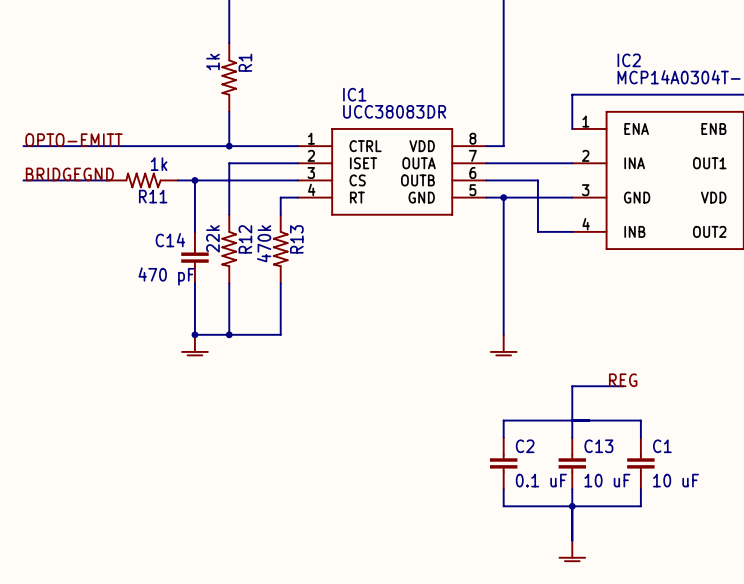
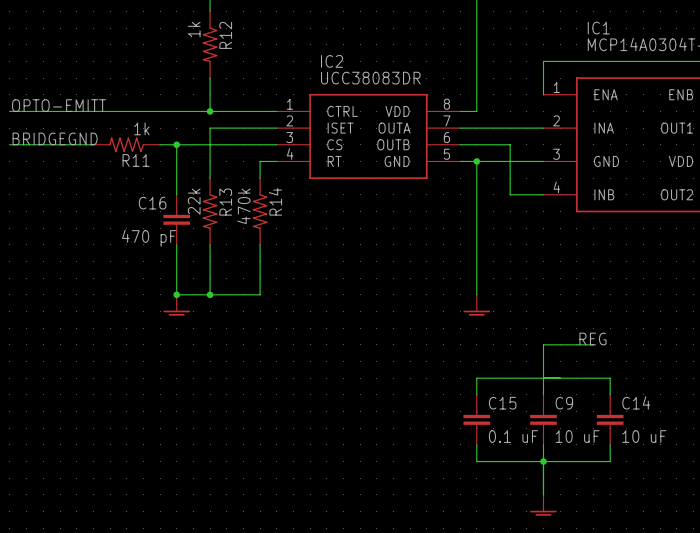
IC2 name: IC2 (629, 60) -> IC1 (598, 28)
R1 name: R1 (245, 62) -> R12 (225, 35)
IC1 name: IC1 (354, 94) -> IC2 (332, 61)
R12 name: R12 (245, 239) -> R13 (225, 202)
R13 name: R13 (296, 239) -> R14 (275, 201)
C14 name: C14 (170, 240) -> C16 (152, 203)
C2 name: C2 (525, 446) -> C15 (502, 403)
C13 name: C13 (598, 446) -> C9 (564, 403)
C1 name: C1 (662, 446) -> C14 (636, 402)

